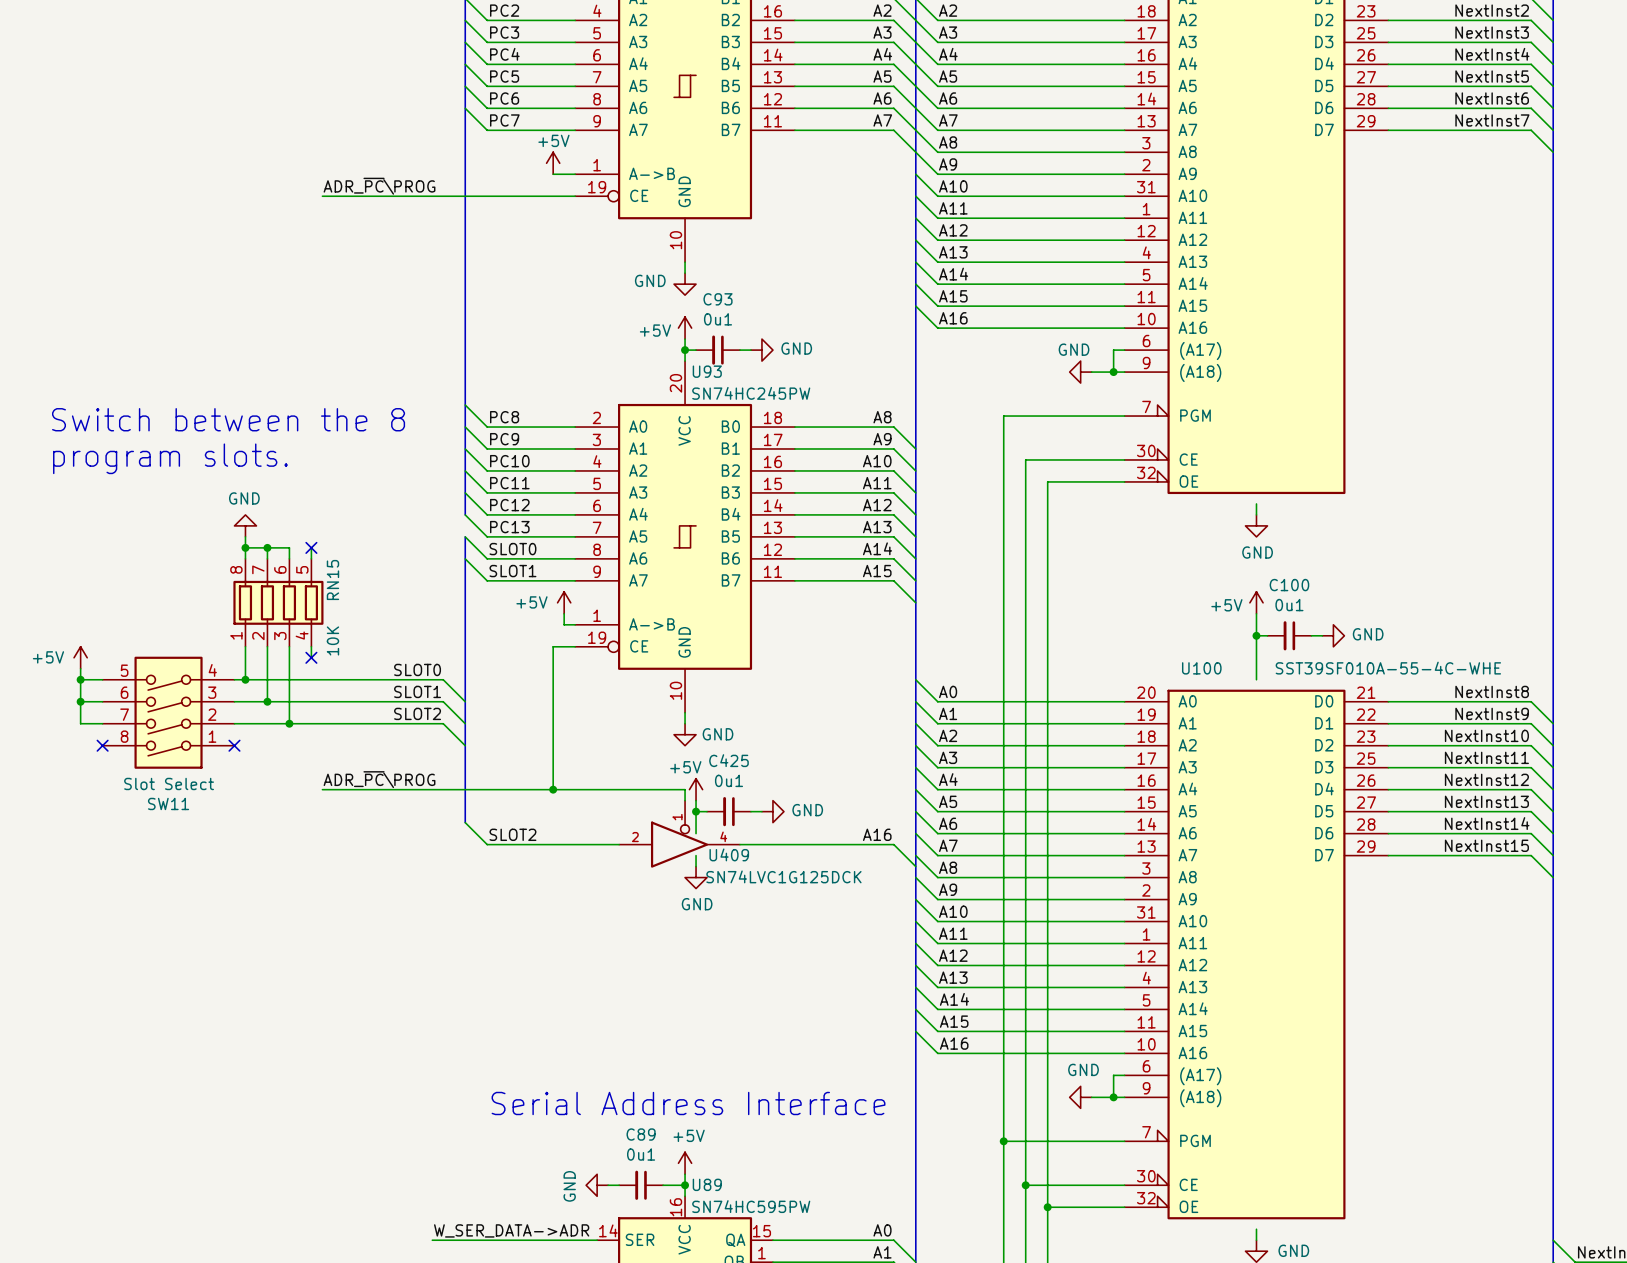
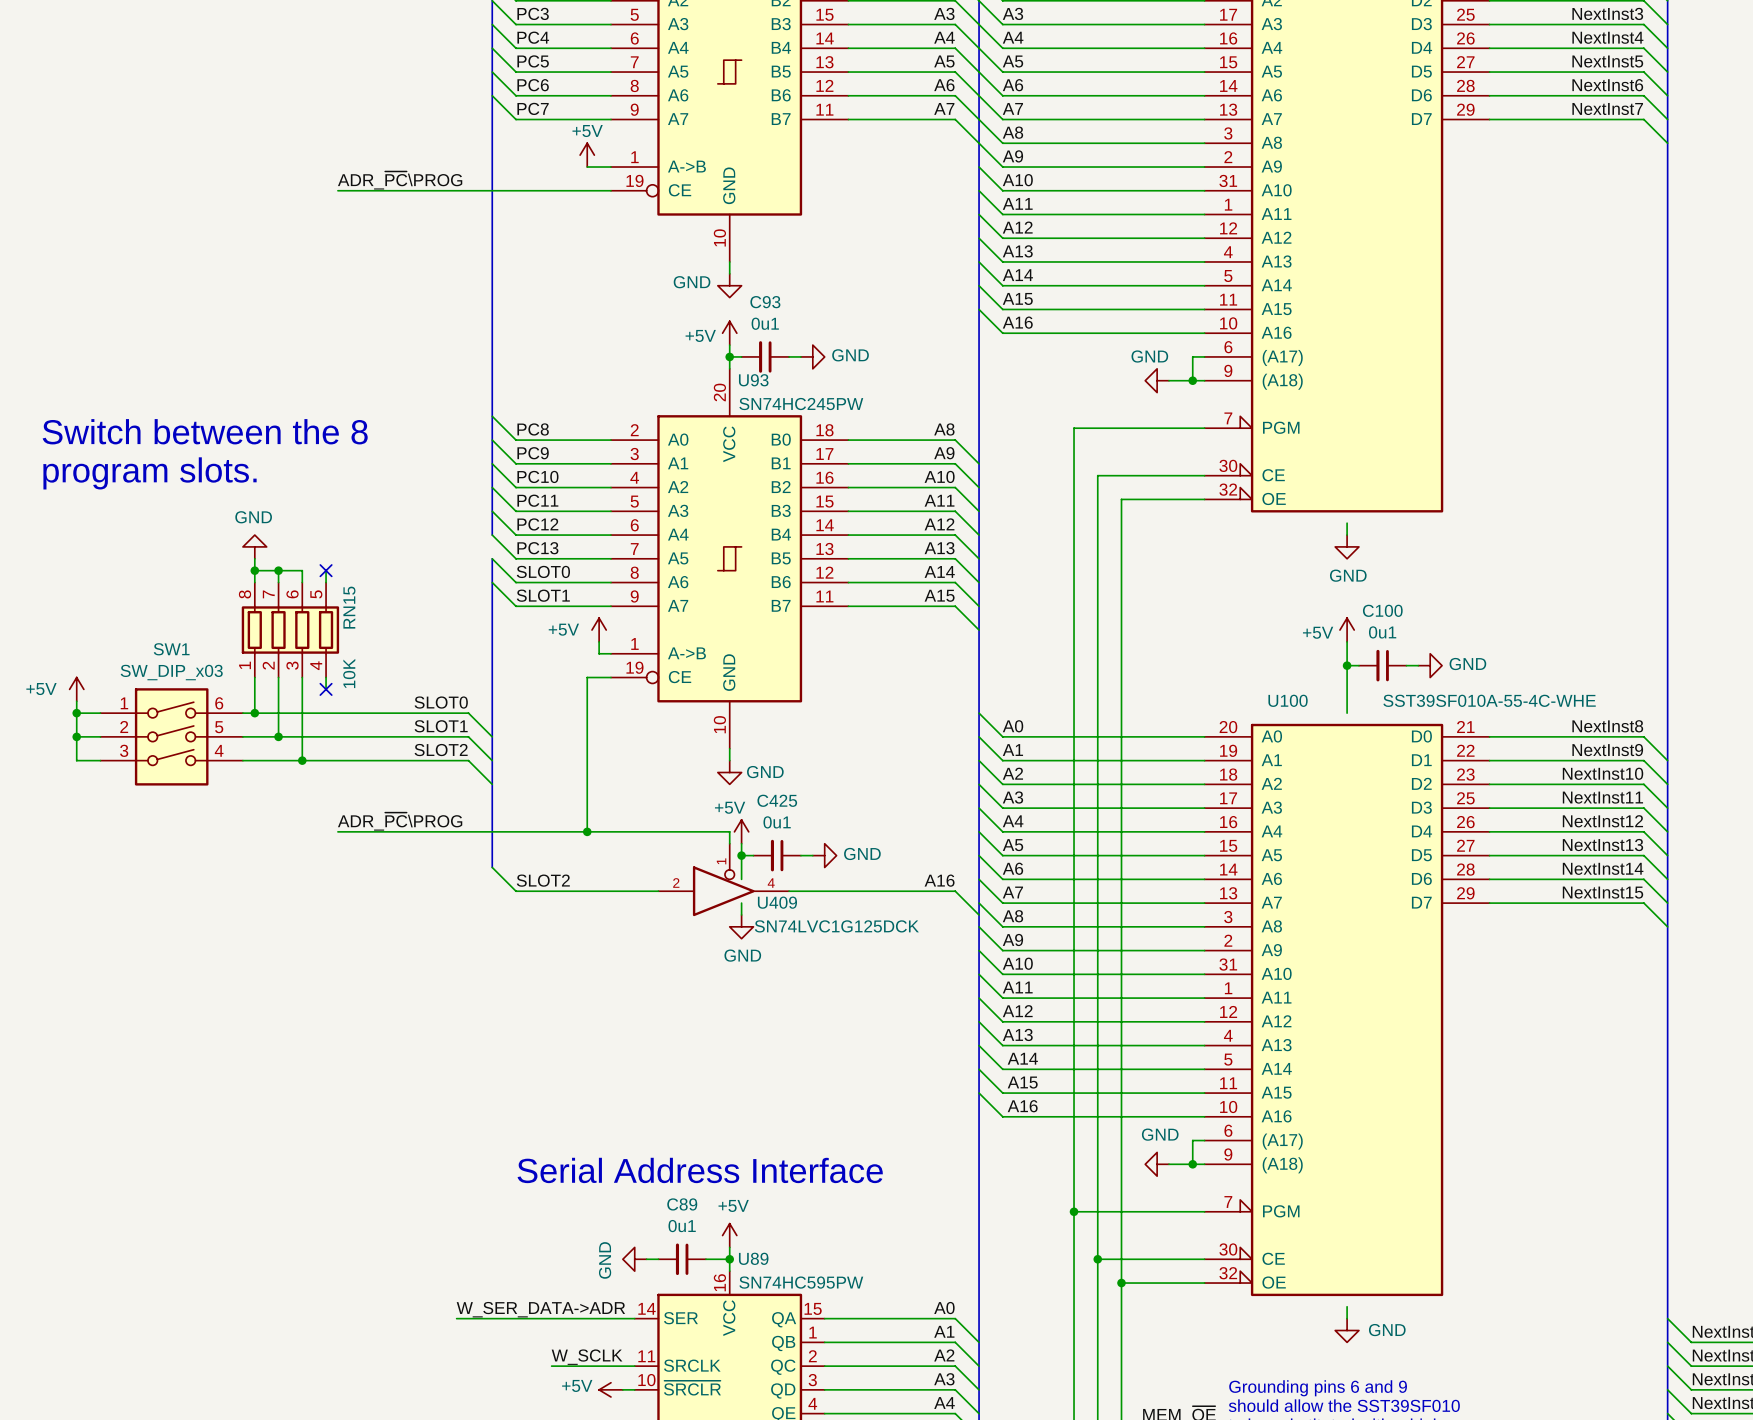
SW1: none -> SW_DIP_x03 (171, 736)
SW11: Slot Select (168, 712) -> none
no-connect mark: (102, 745) -> none
no-connect mark: (234, 745) -> none

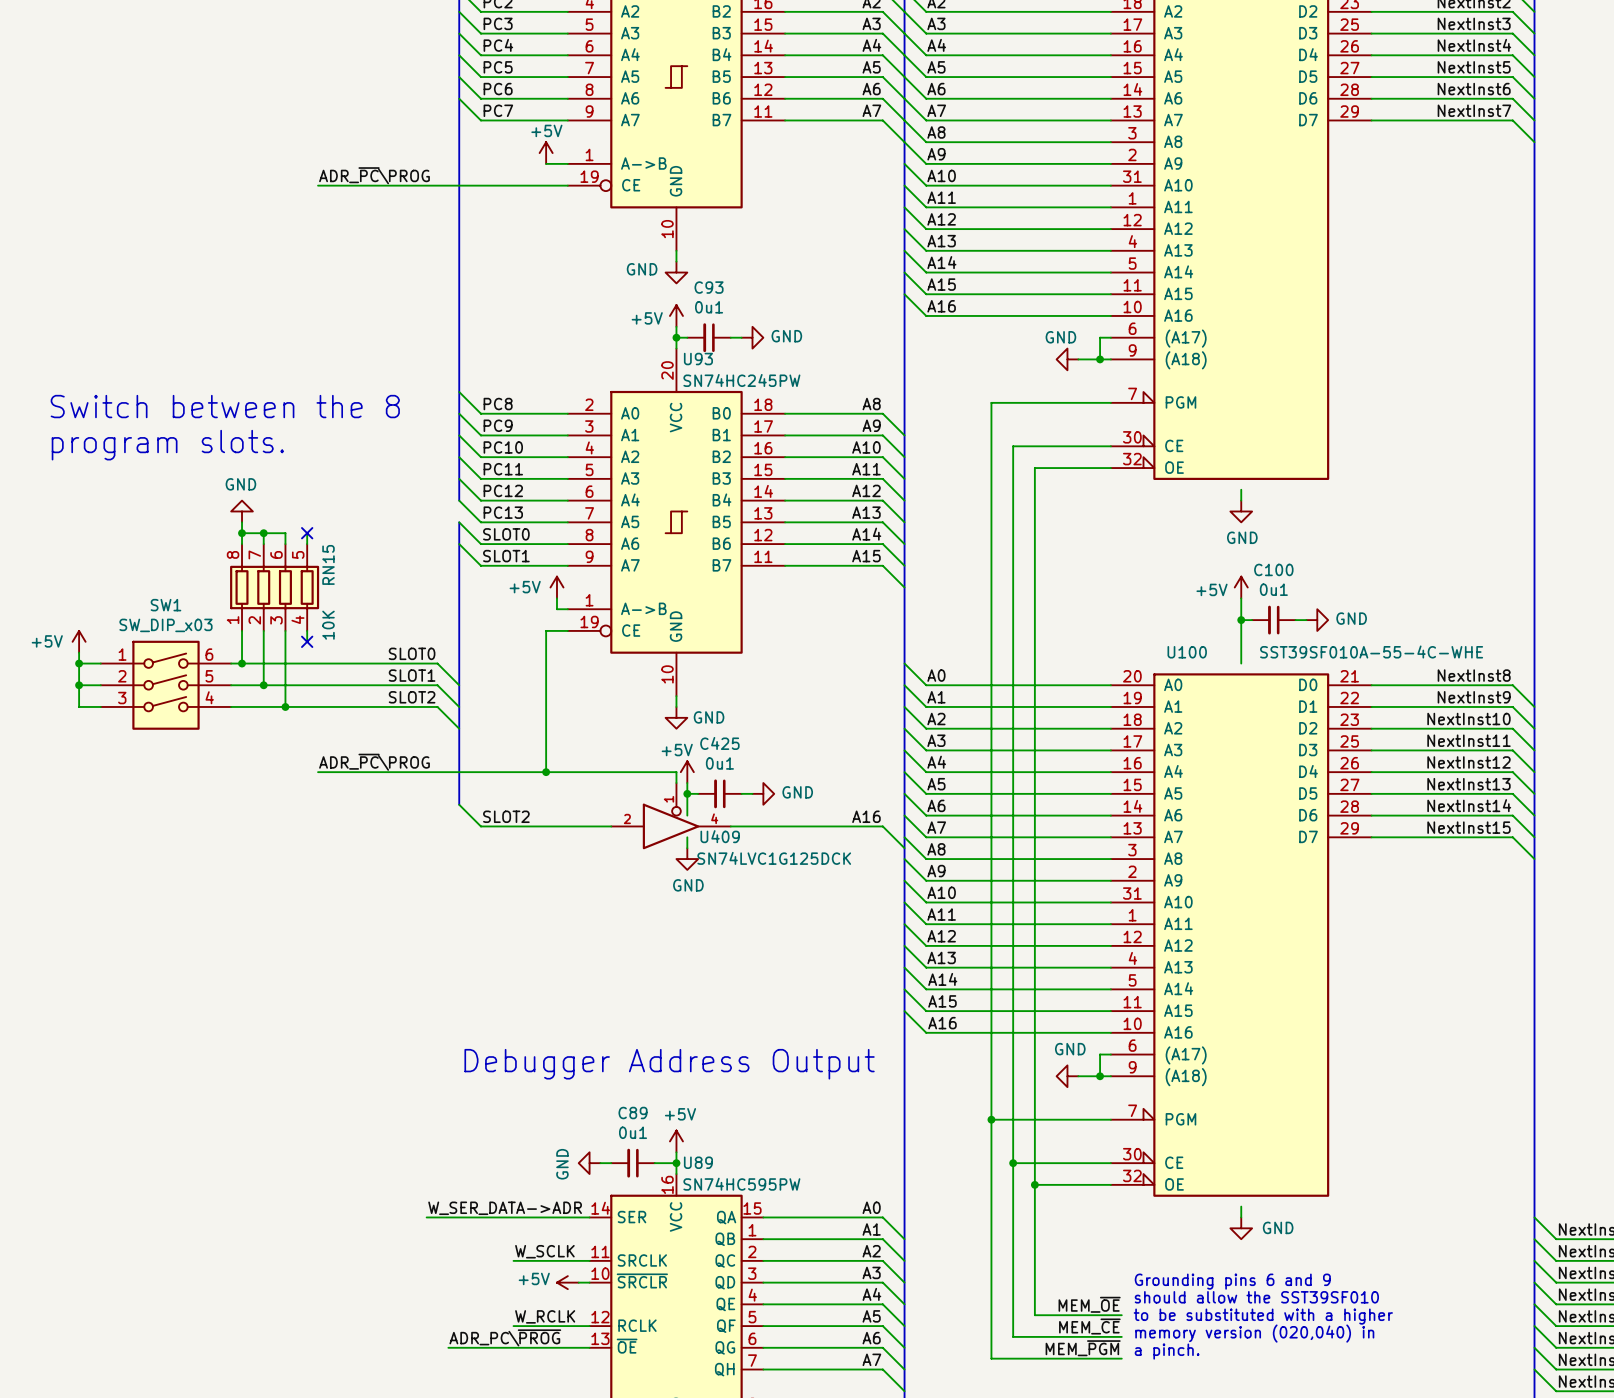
text: none -> Debugger Address Output (669, 1064)
text: Serial Address Interface (700, 1170) -> none

